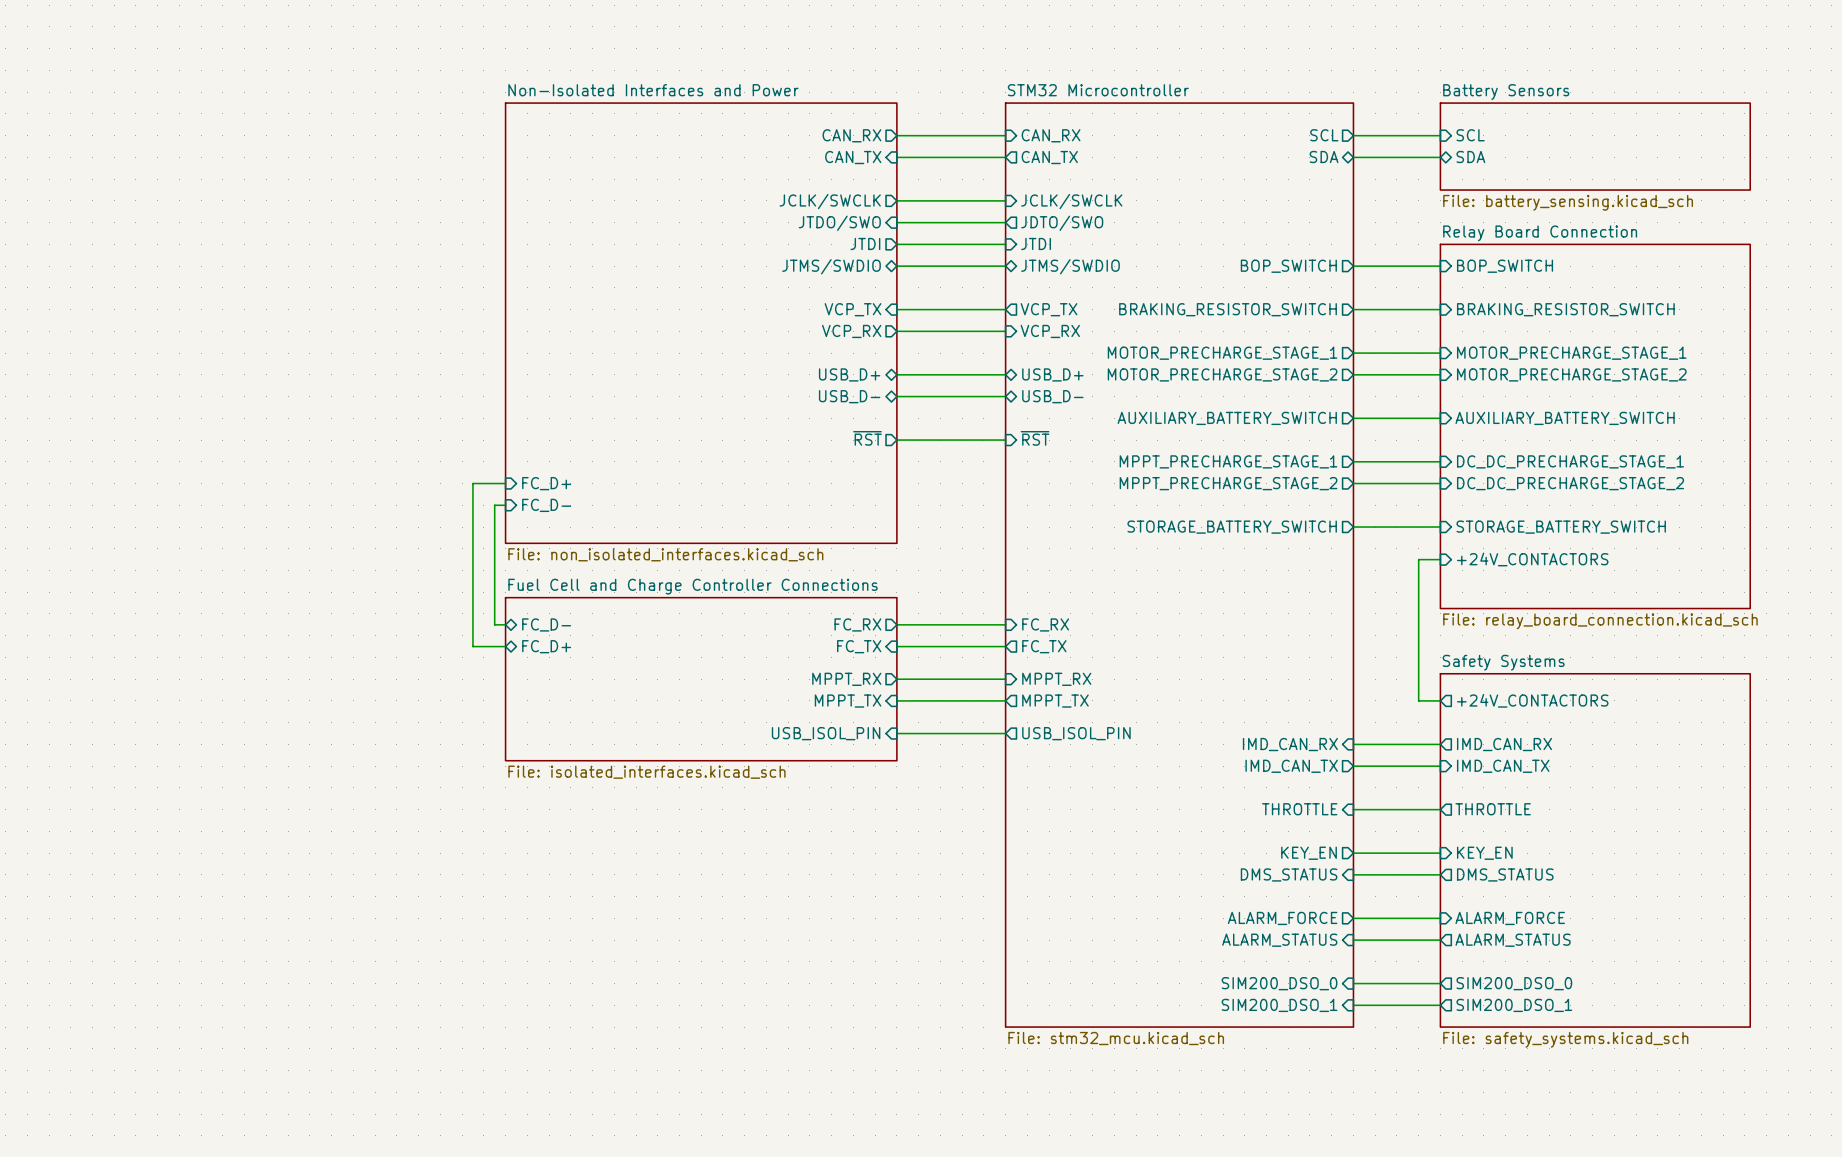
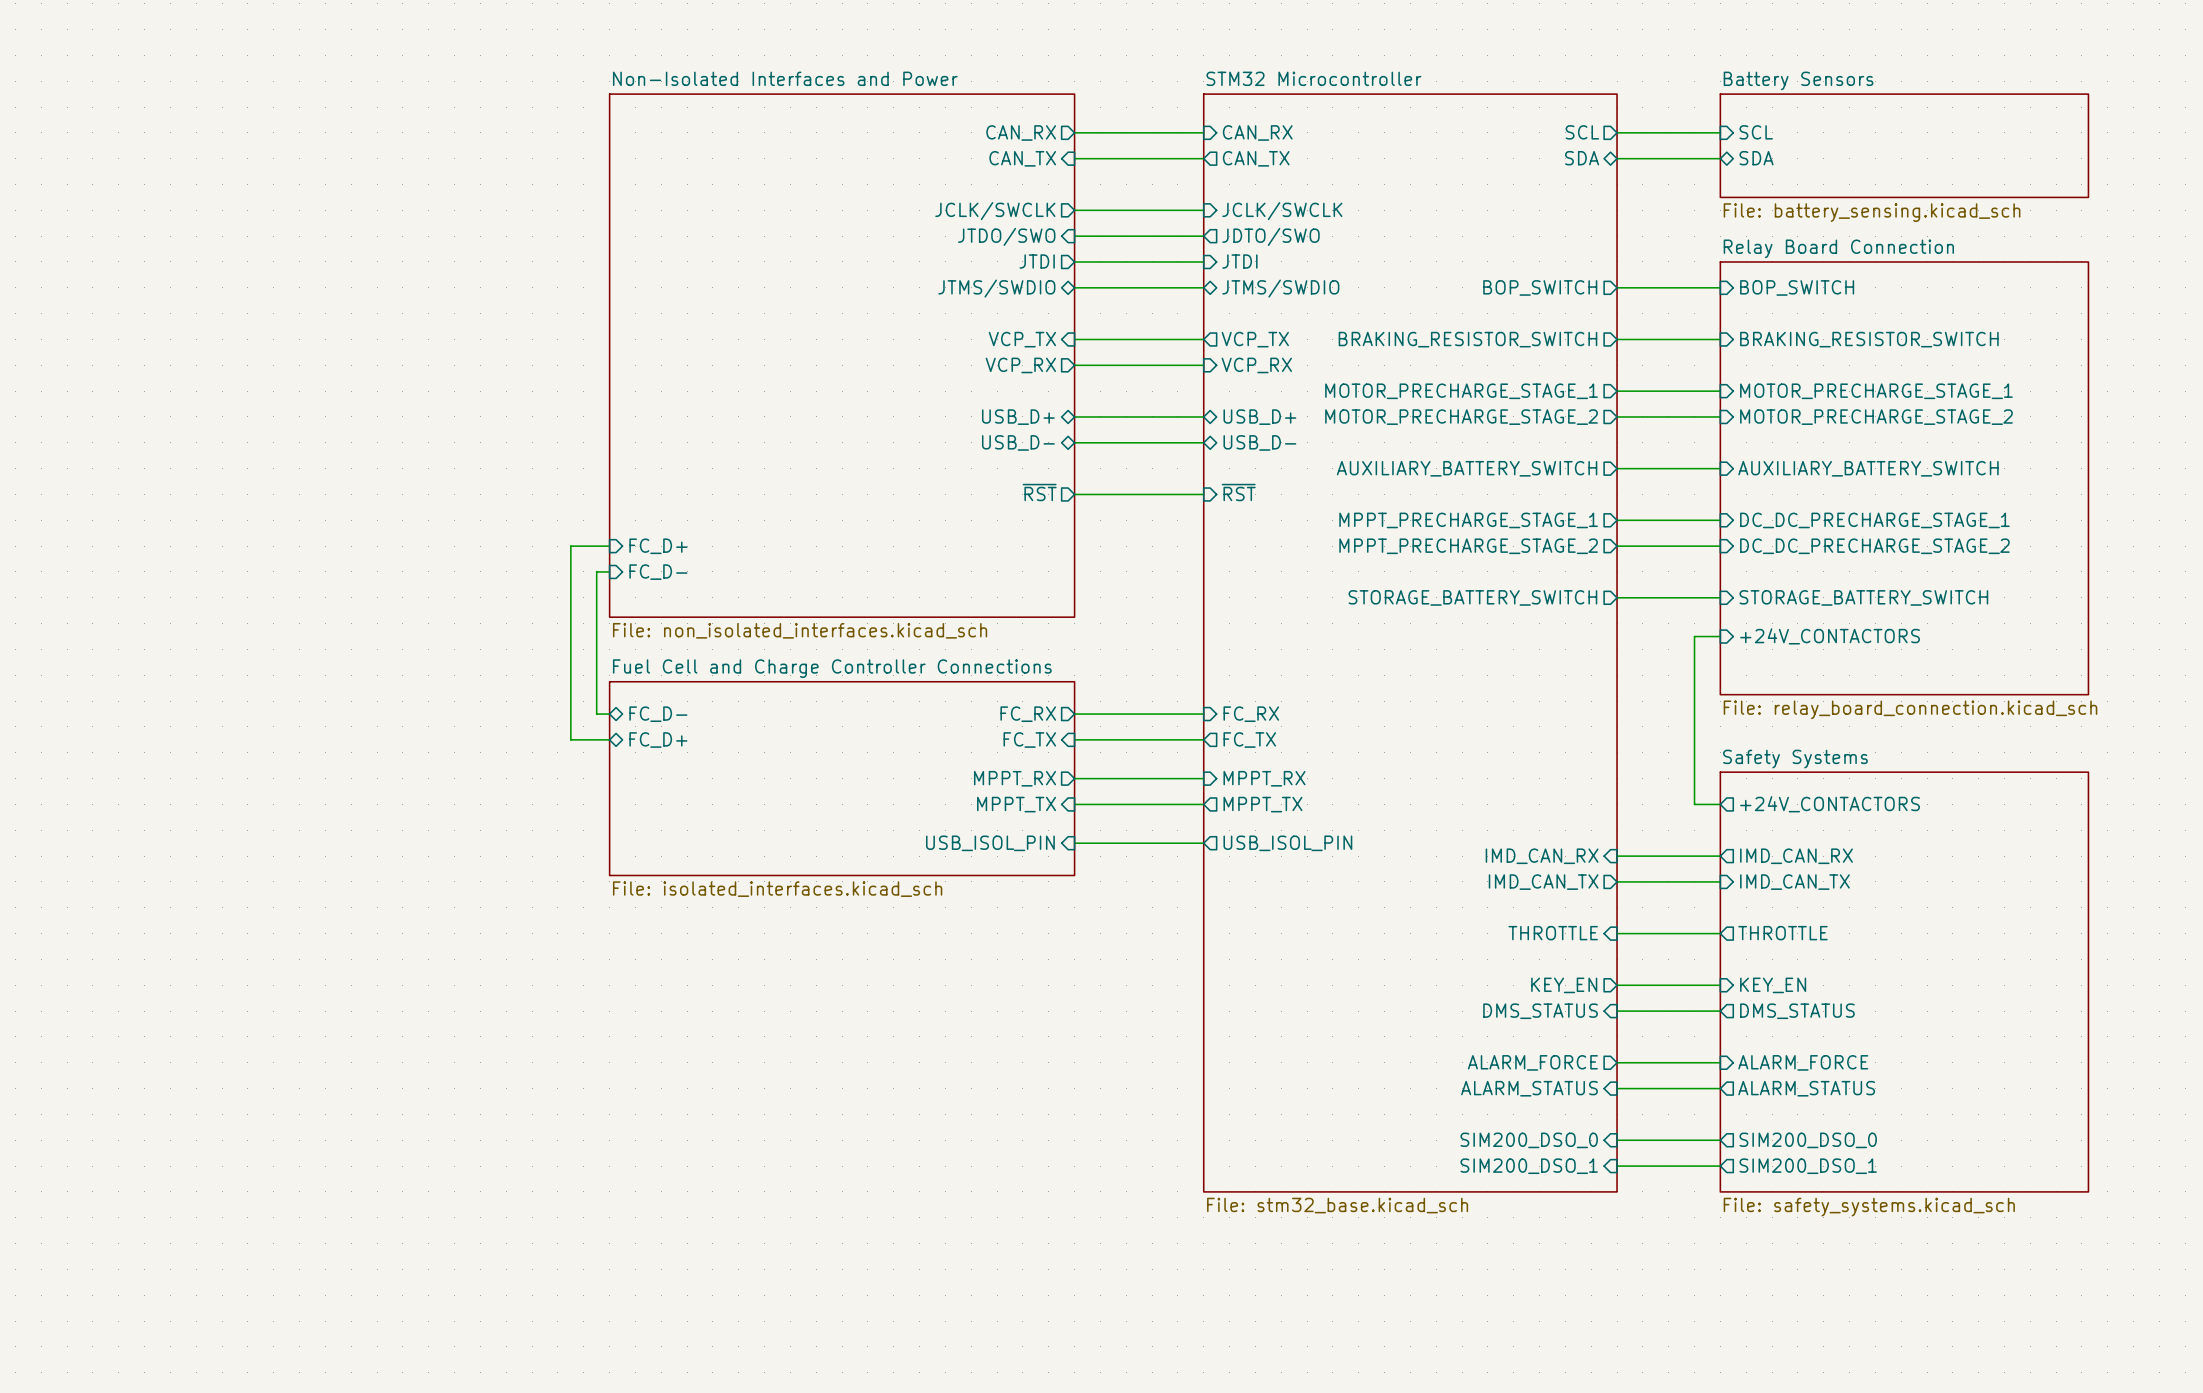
sheet STM32 Microcontroller value: File: stm32_mcu.kicad_sch (1116, 1038) -> File: stm32_base.kicad_sch (1337, 1205)

